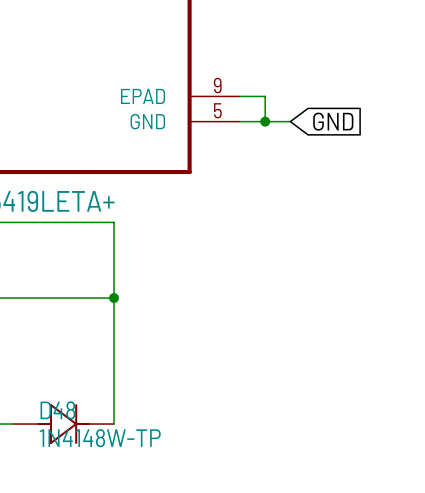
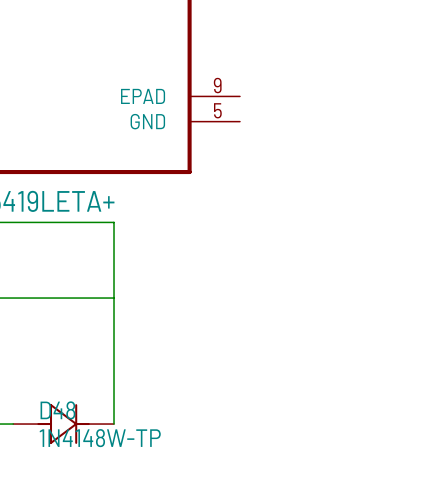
wire: (239, 96) (265, 96) (265, 121) -> none
wire: (239, 121) (290, 121) -> none
junction: (265, 121) -> none
global label: GND (333, 121) -> none
junction: (114, 298) -> none

